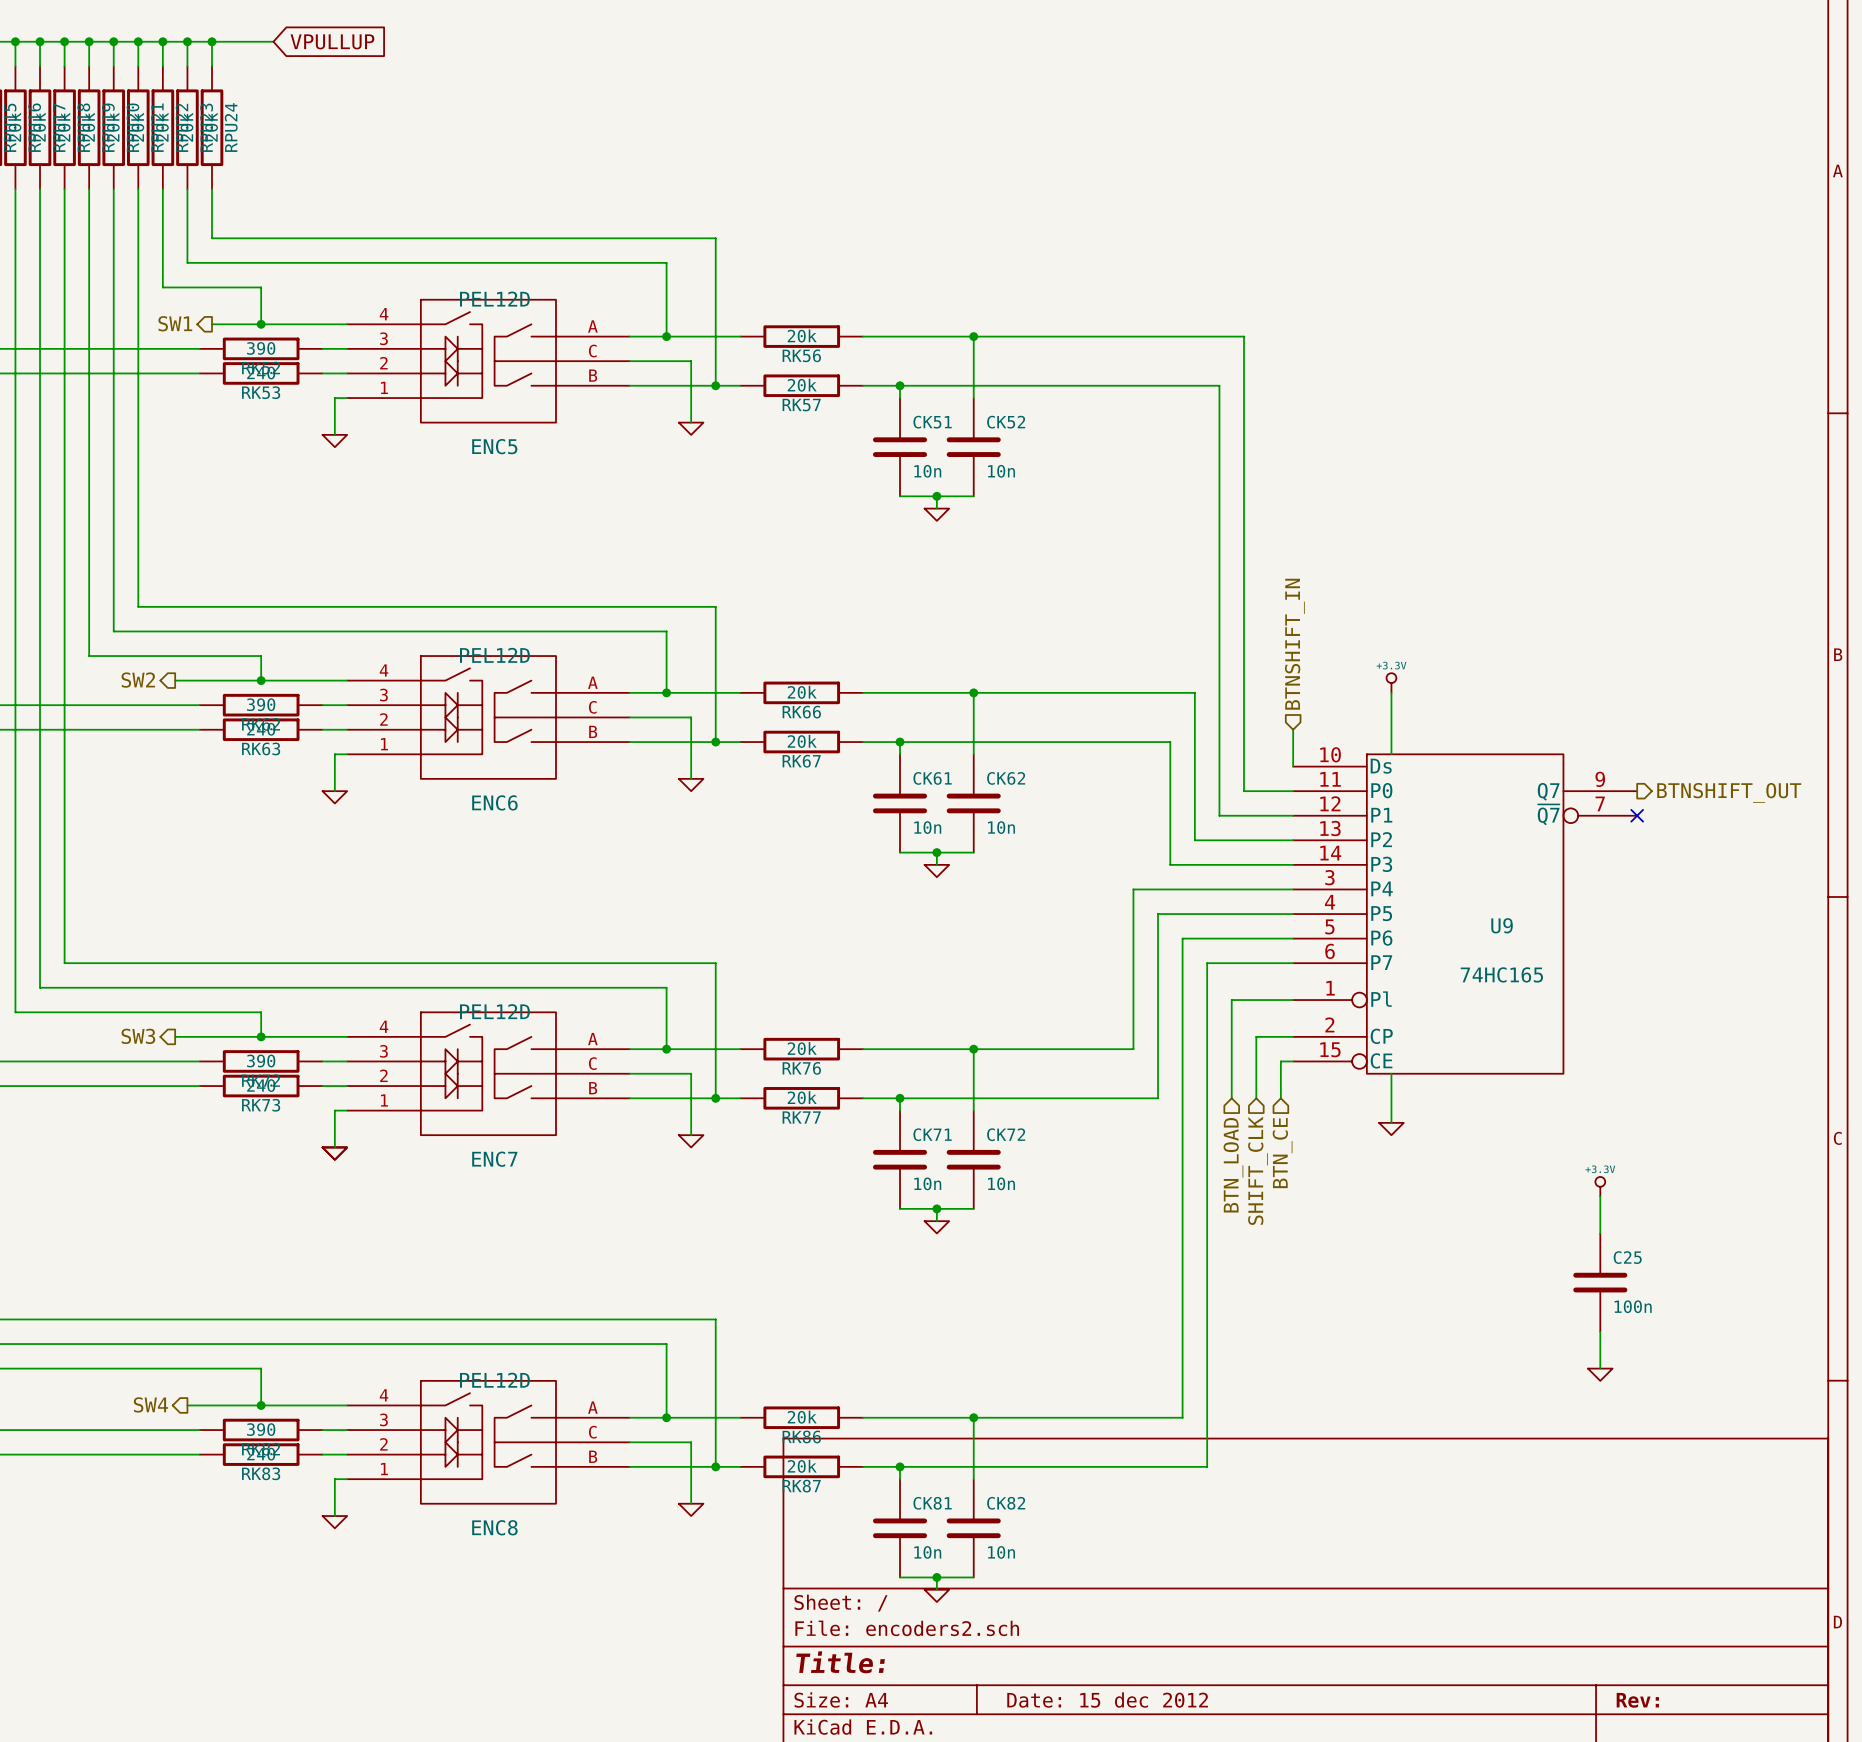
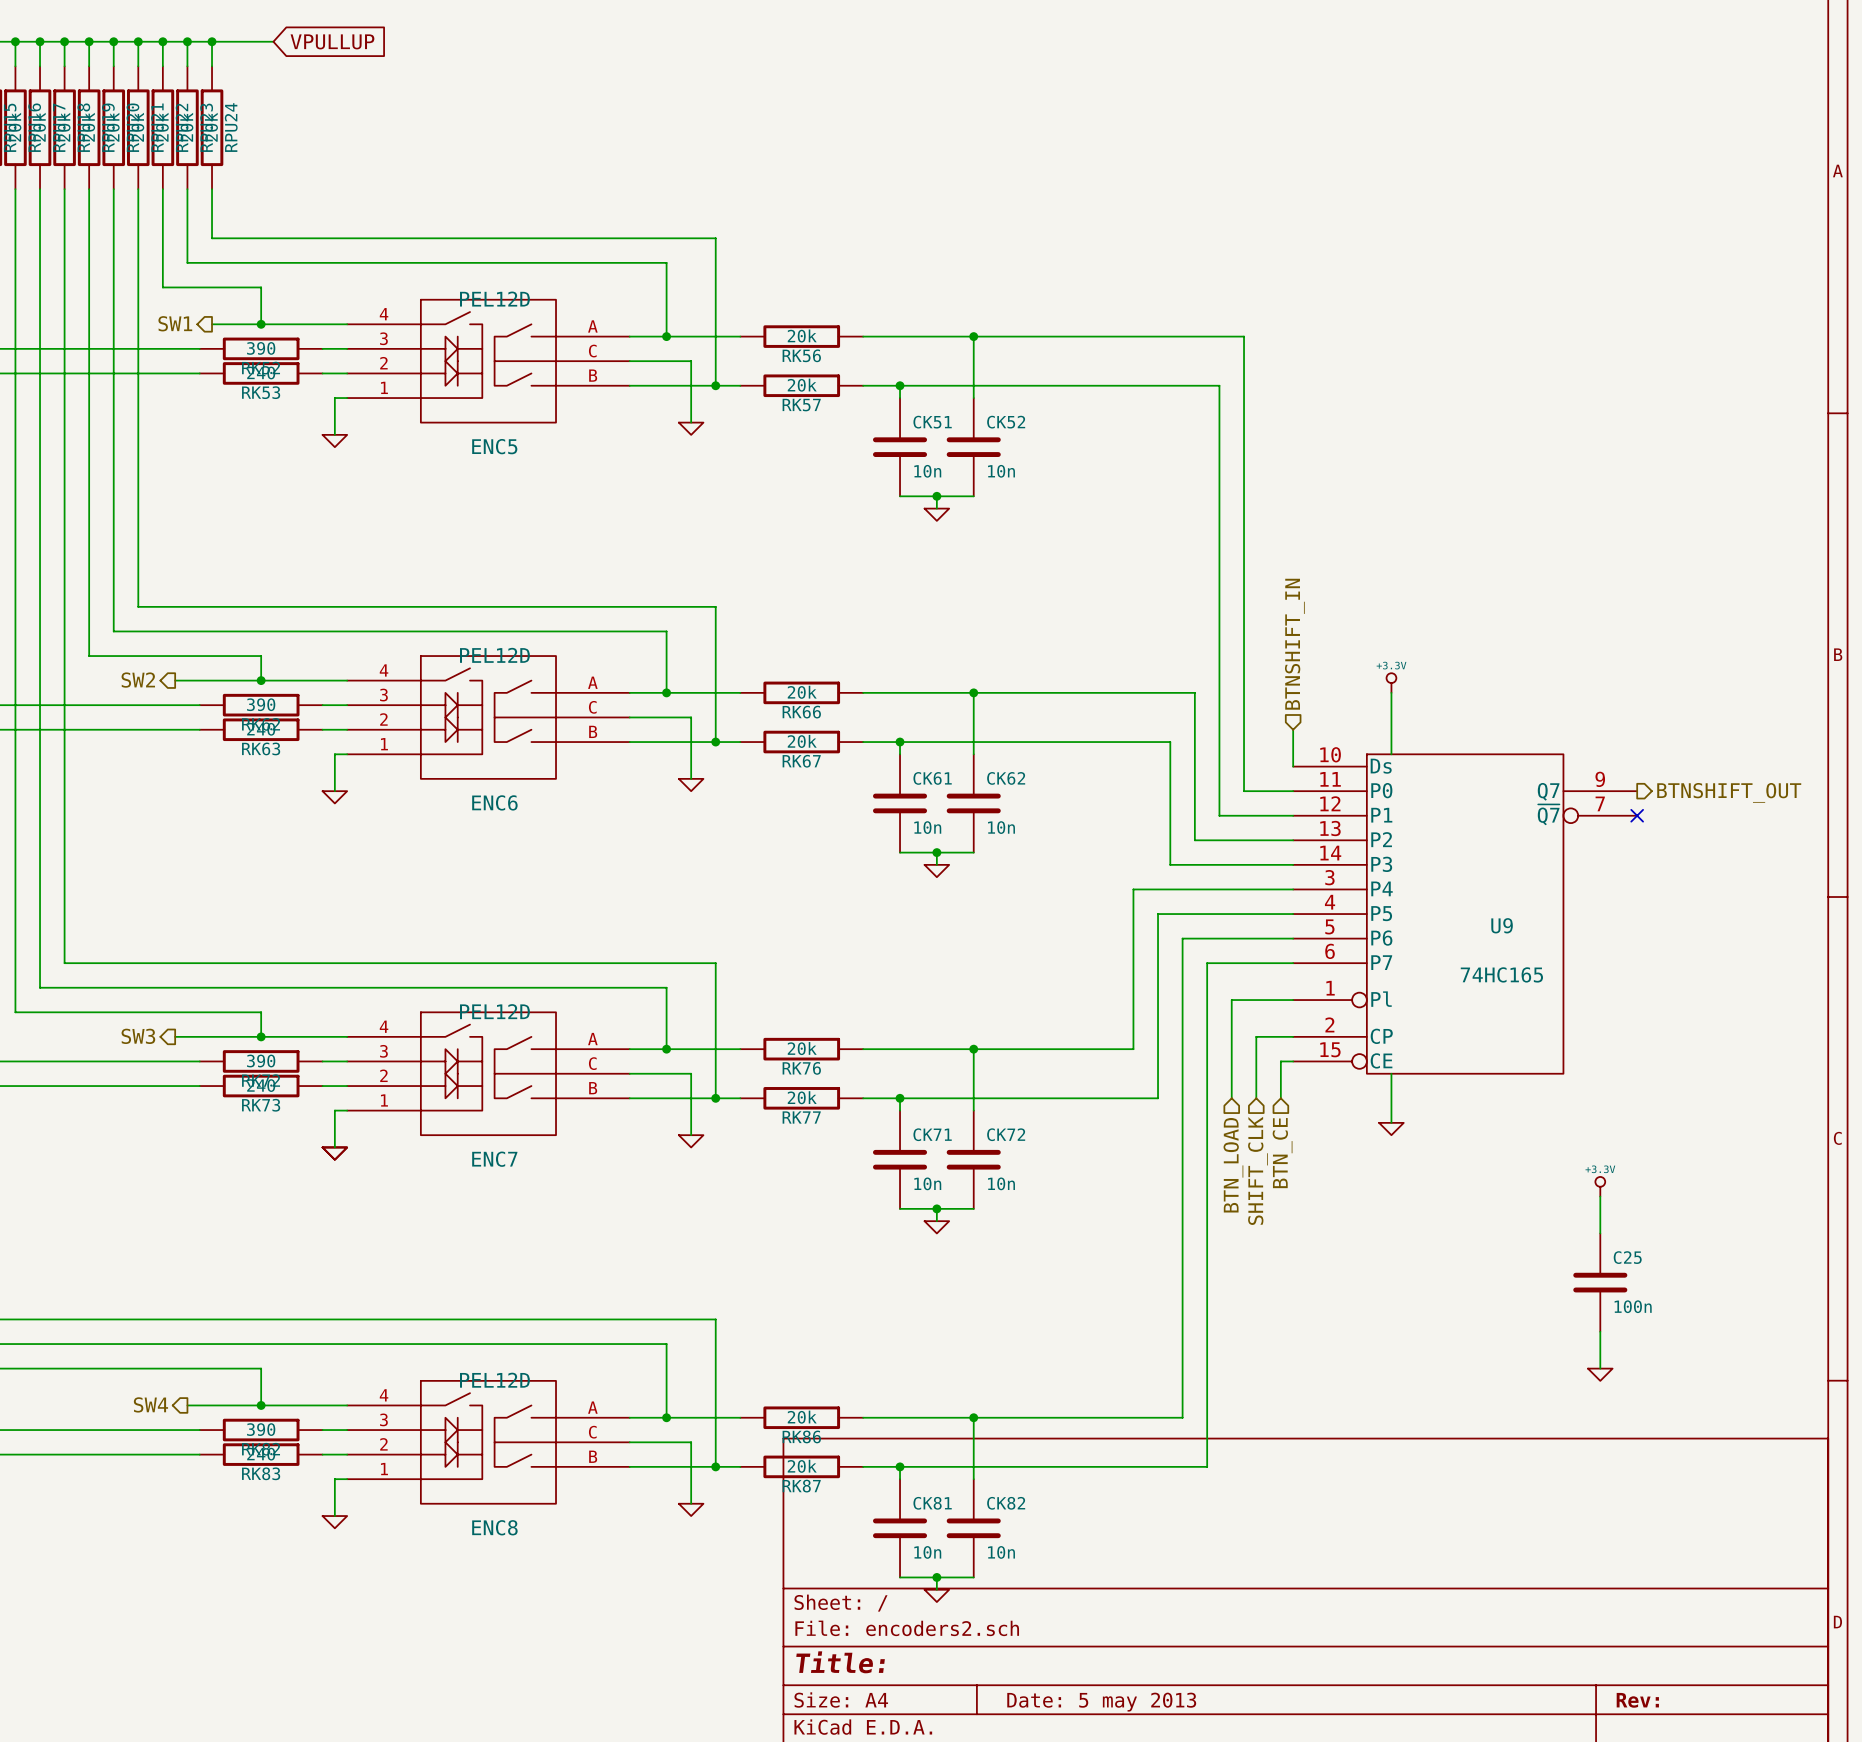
title block: Date: 15 dec 2012 (1107, 1700) -> Date: 5 may 2013 (1101, 1702)

